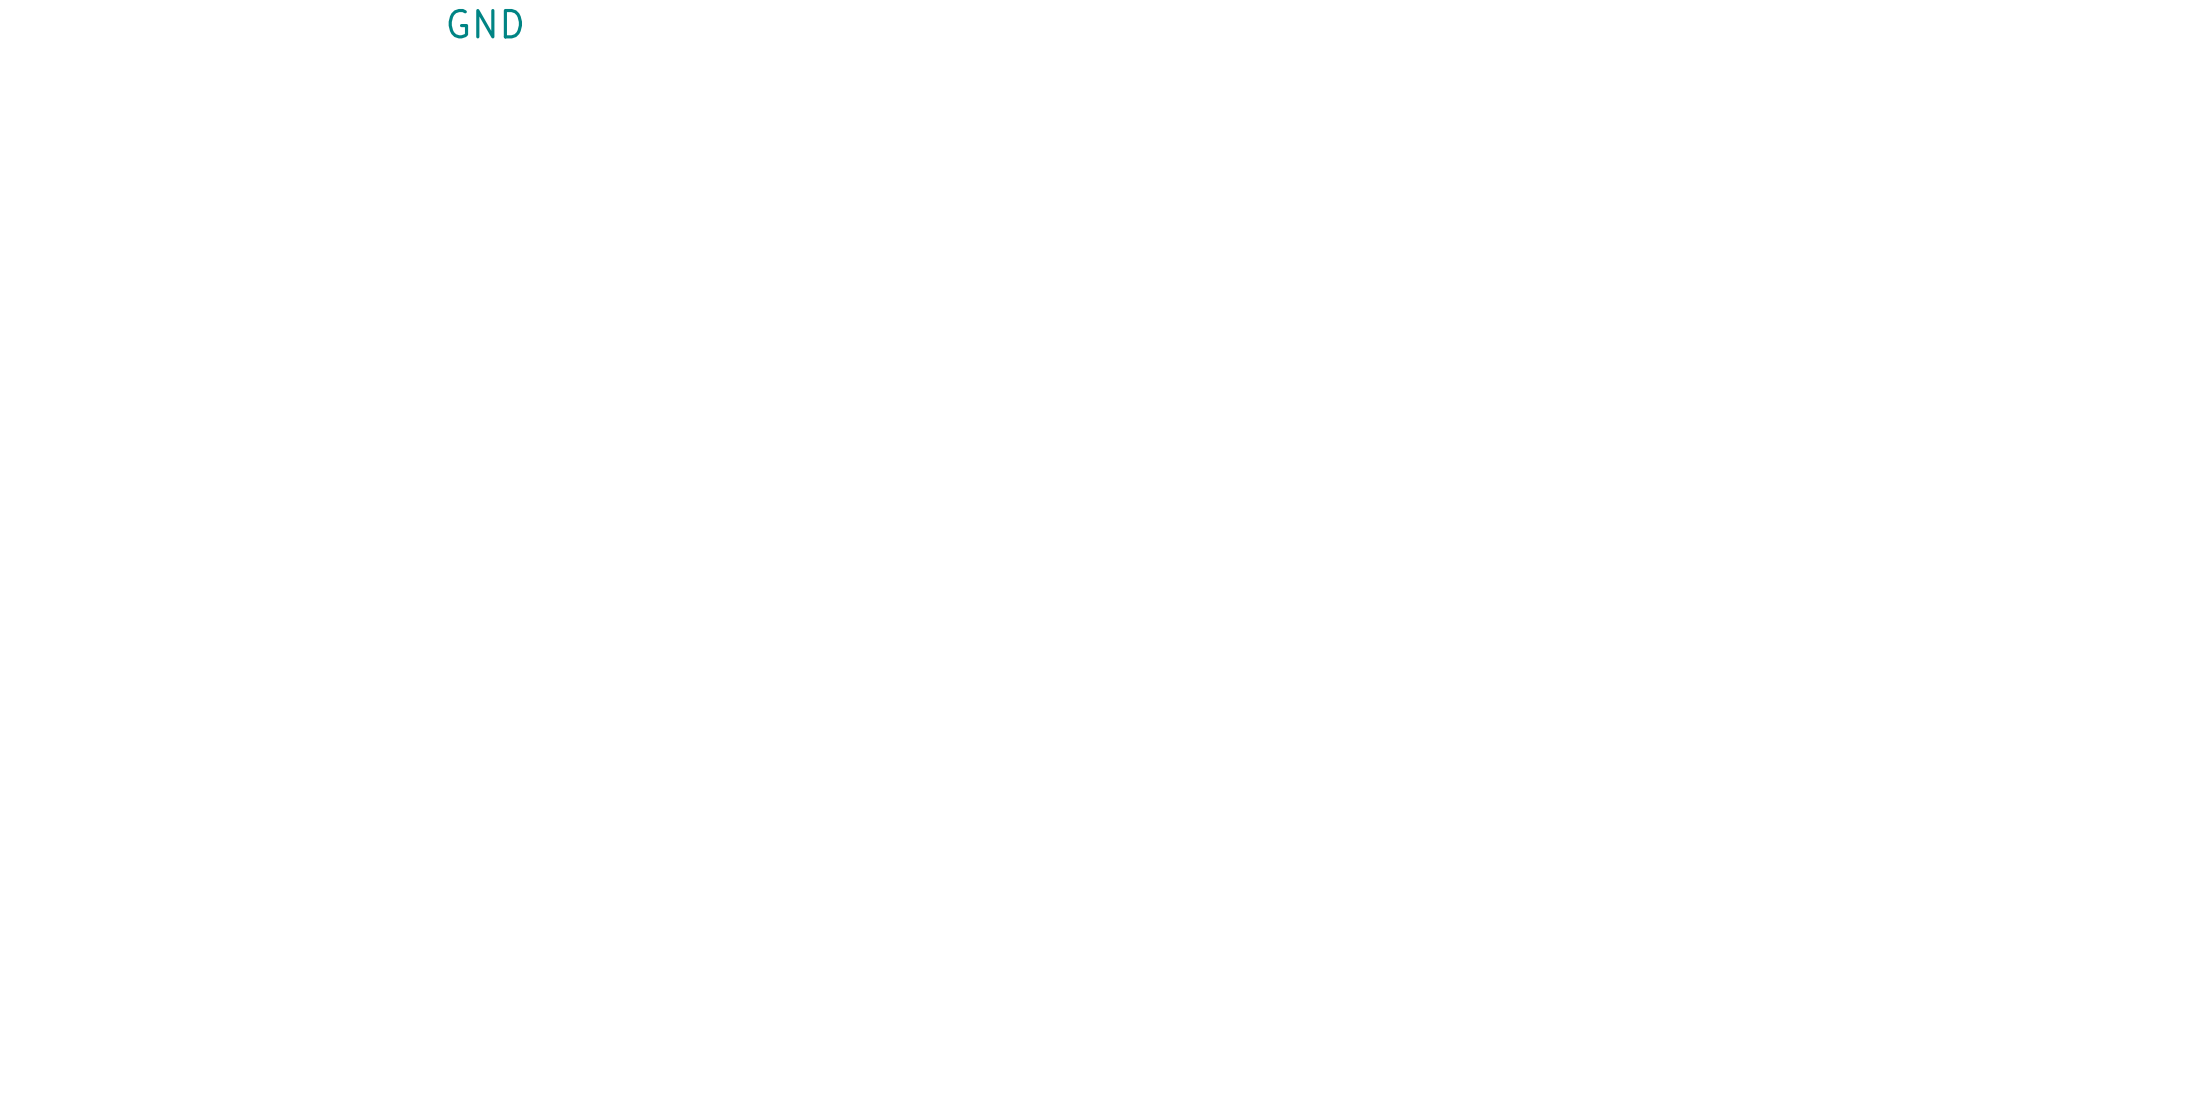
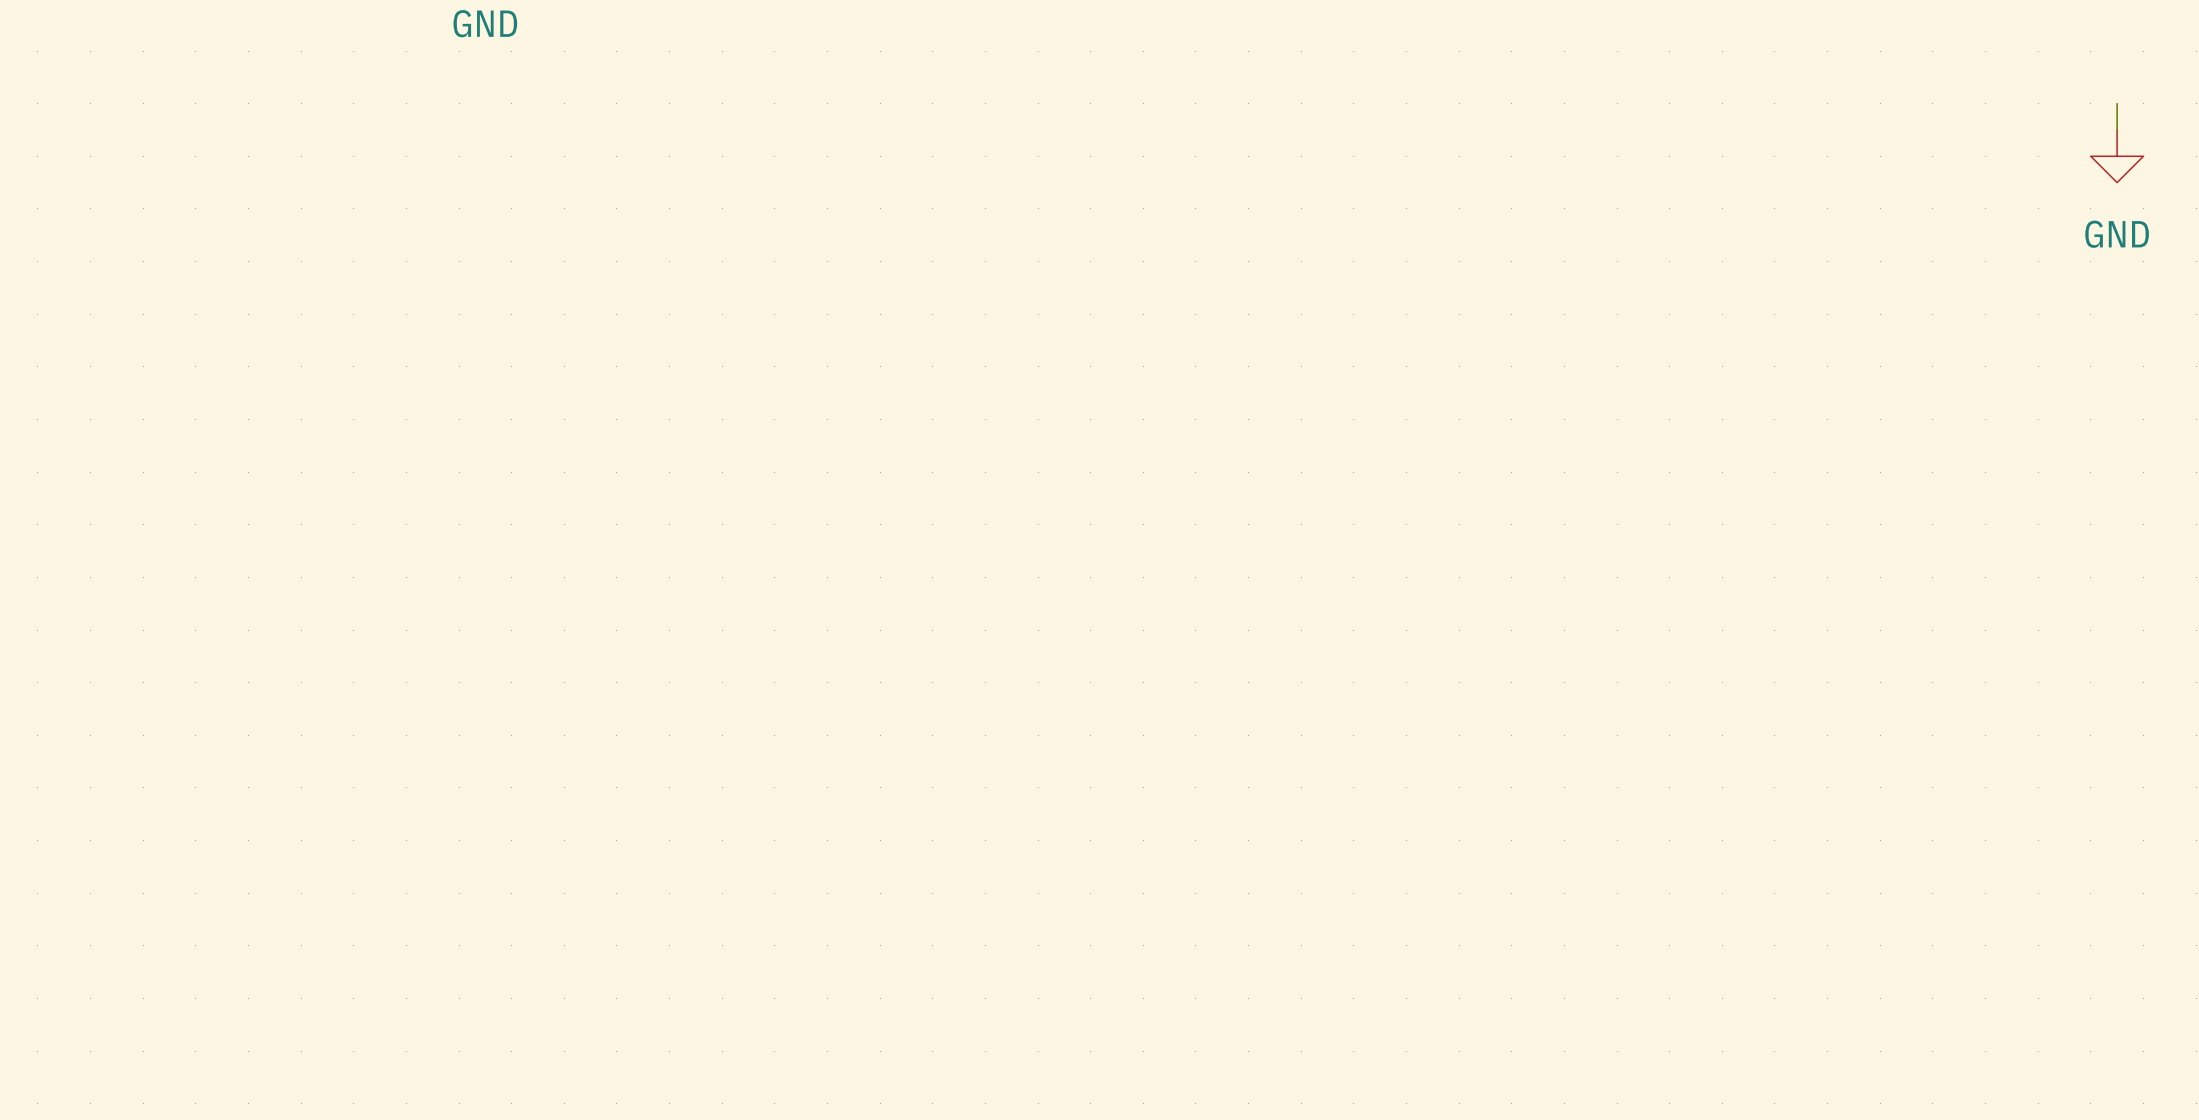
wire: none -> (2117, 103) (2117, 129)
power symbol: none -> GND (2117, 156)

